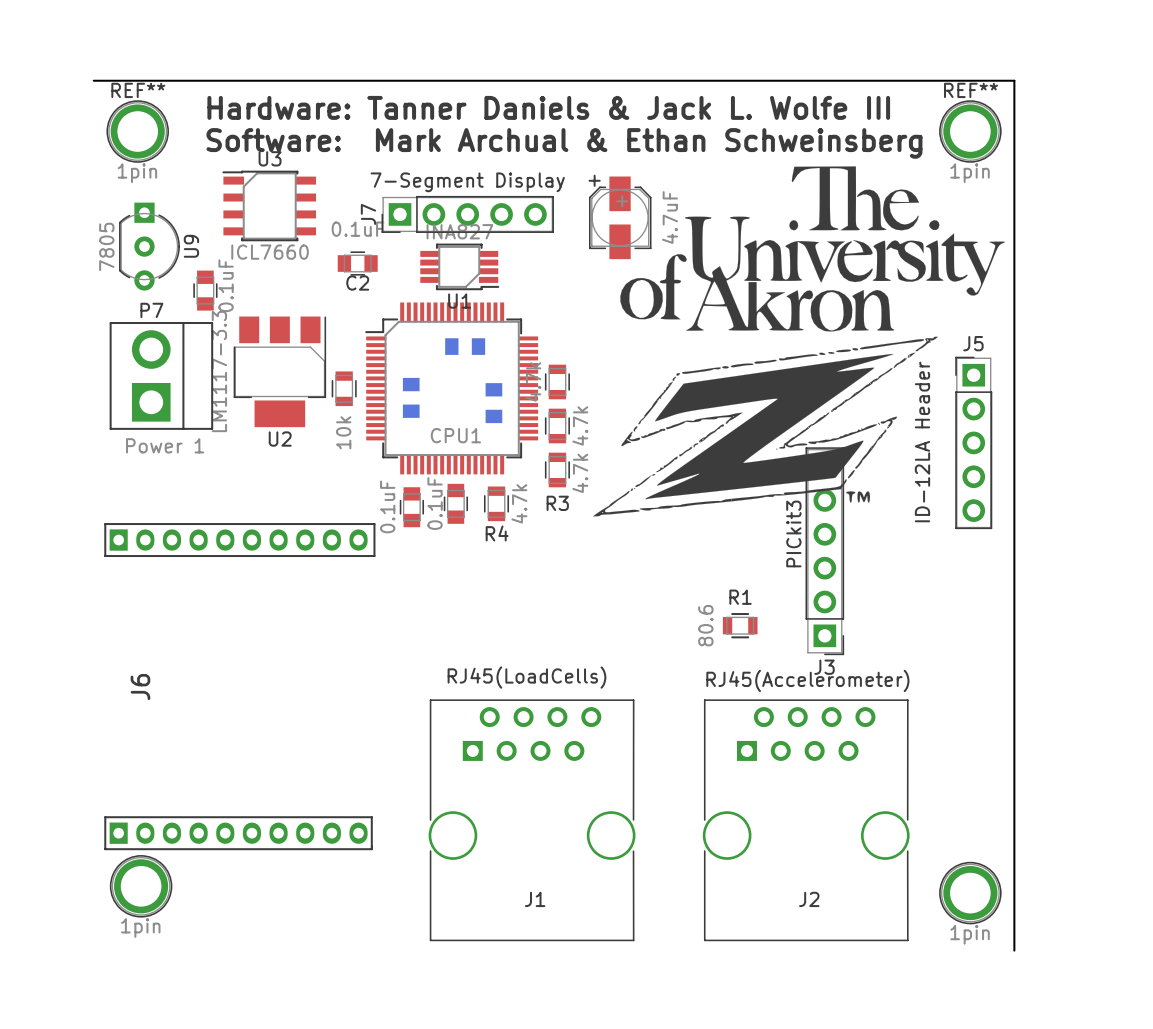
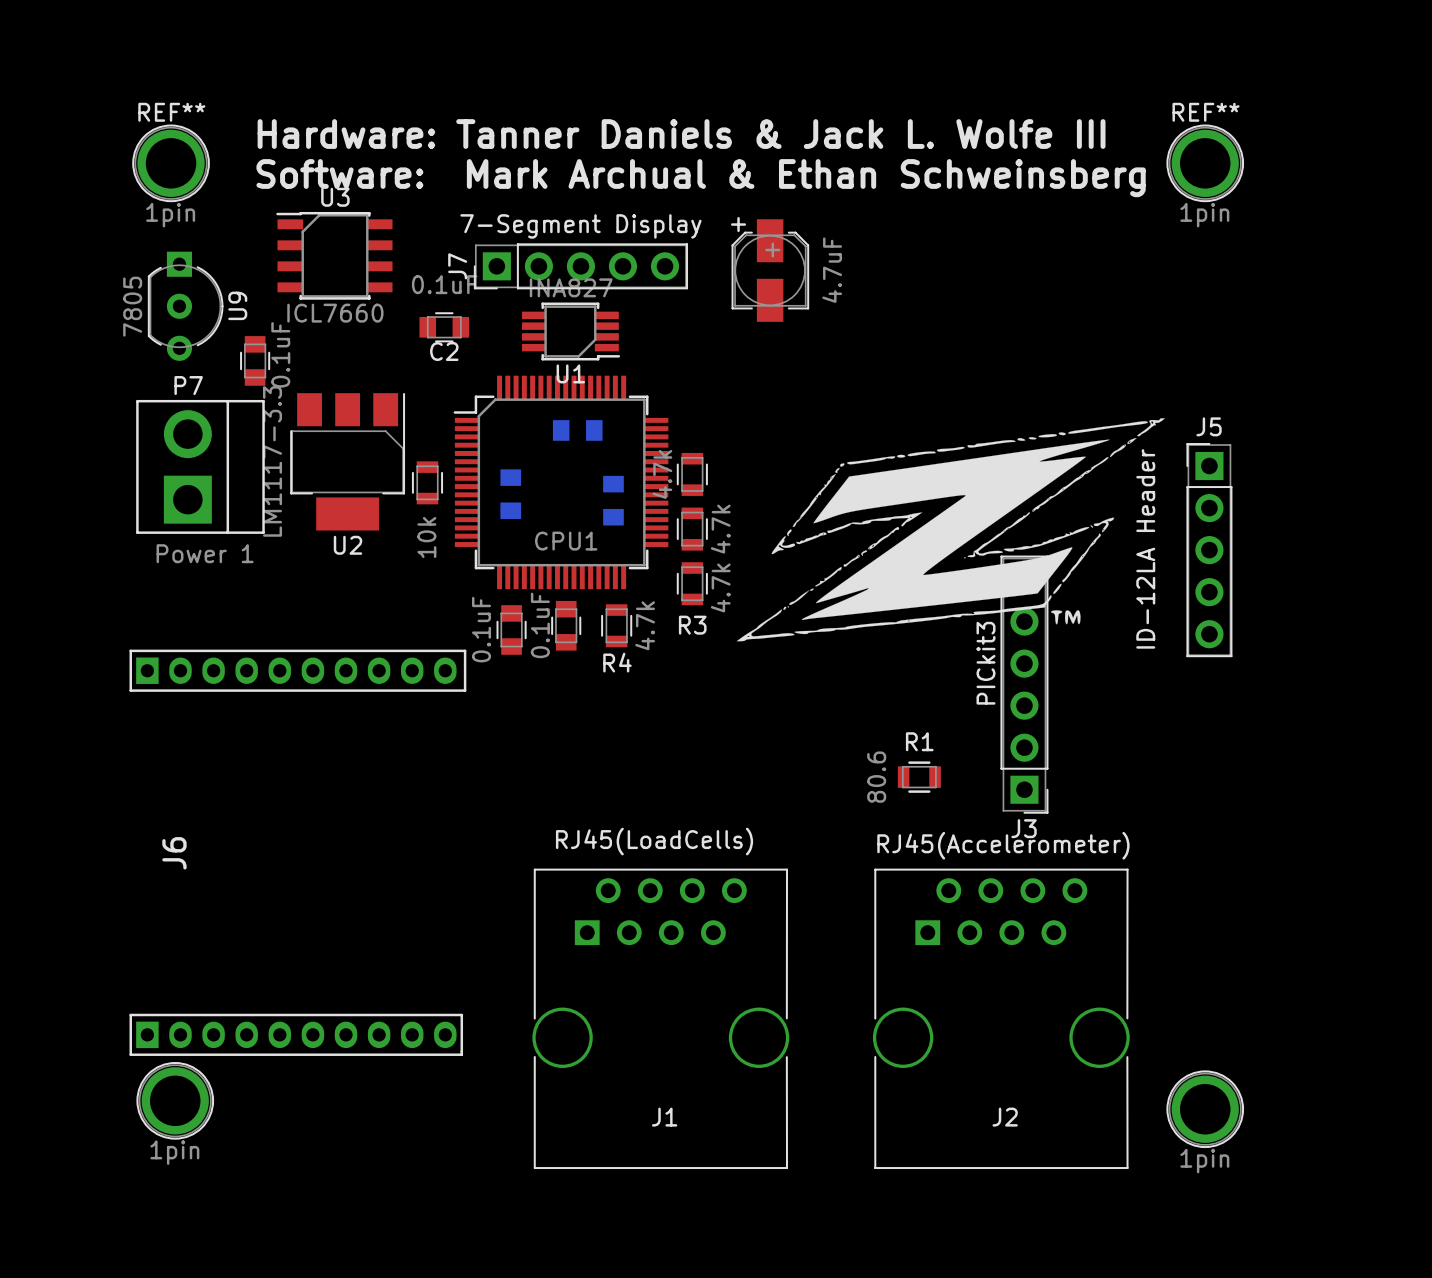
board edge: (93, 80) (1014, 80) (1014, 950) -> none
drawing: [620, 166, 1006, 332] -> none

